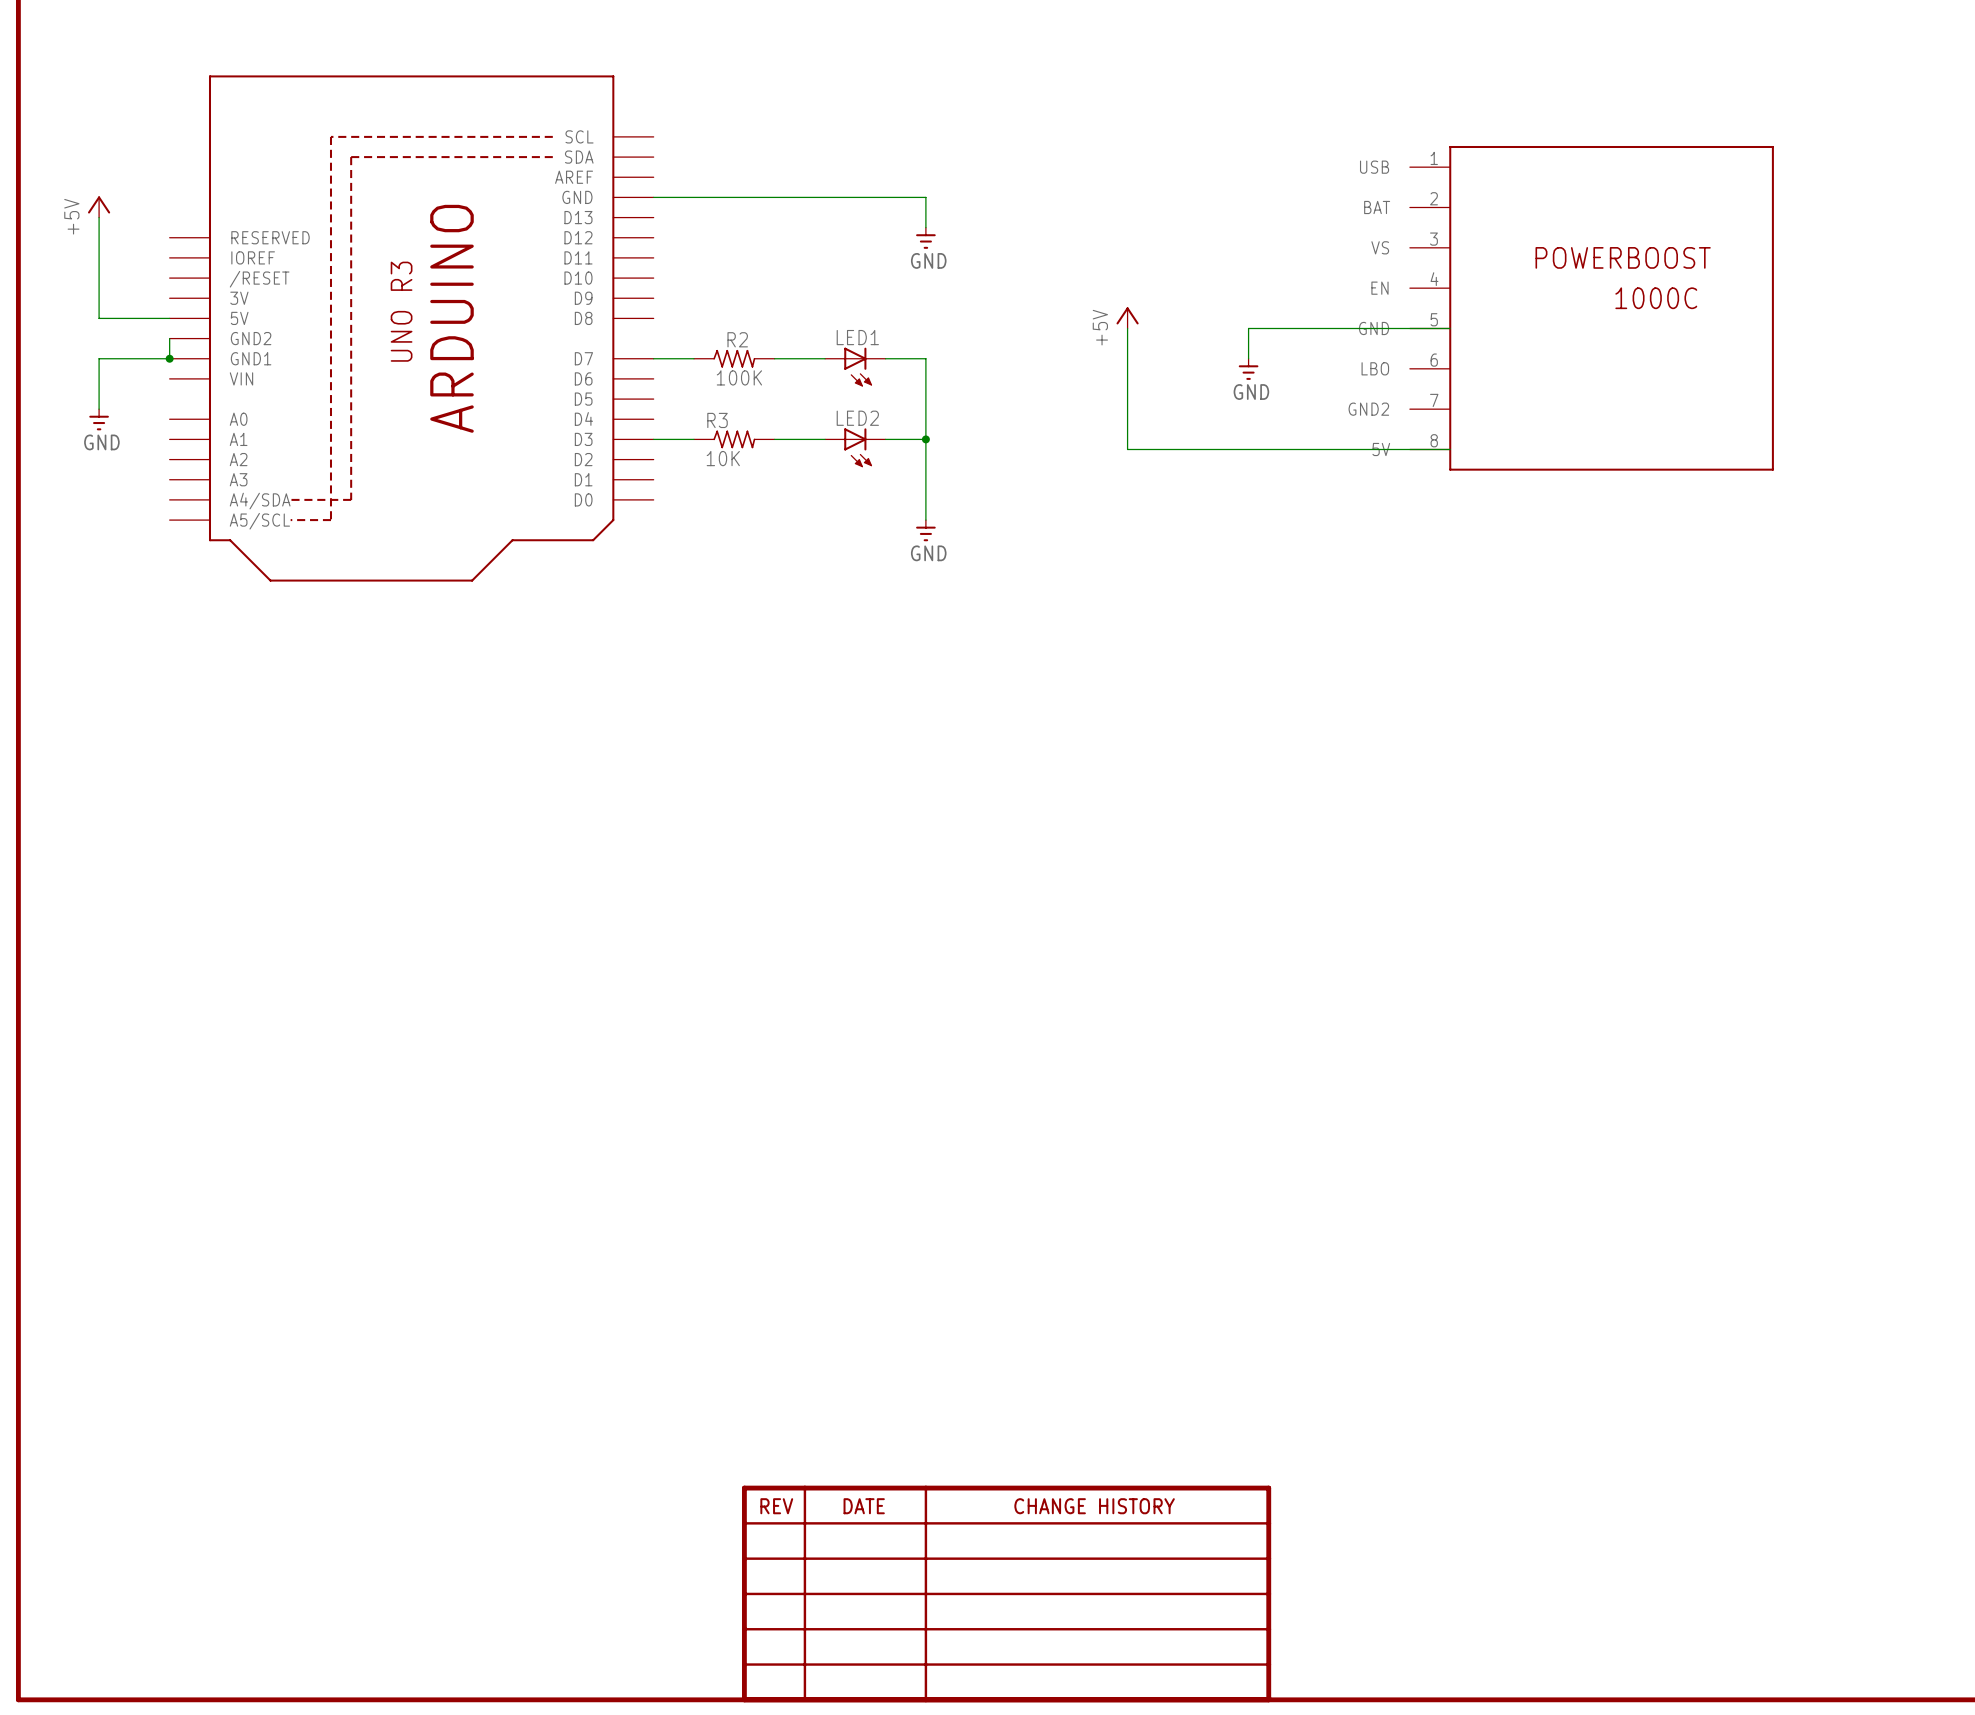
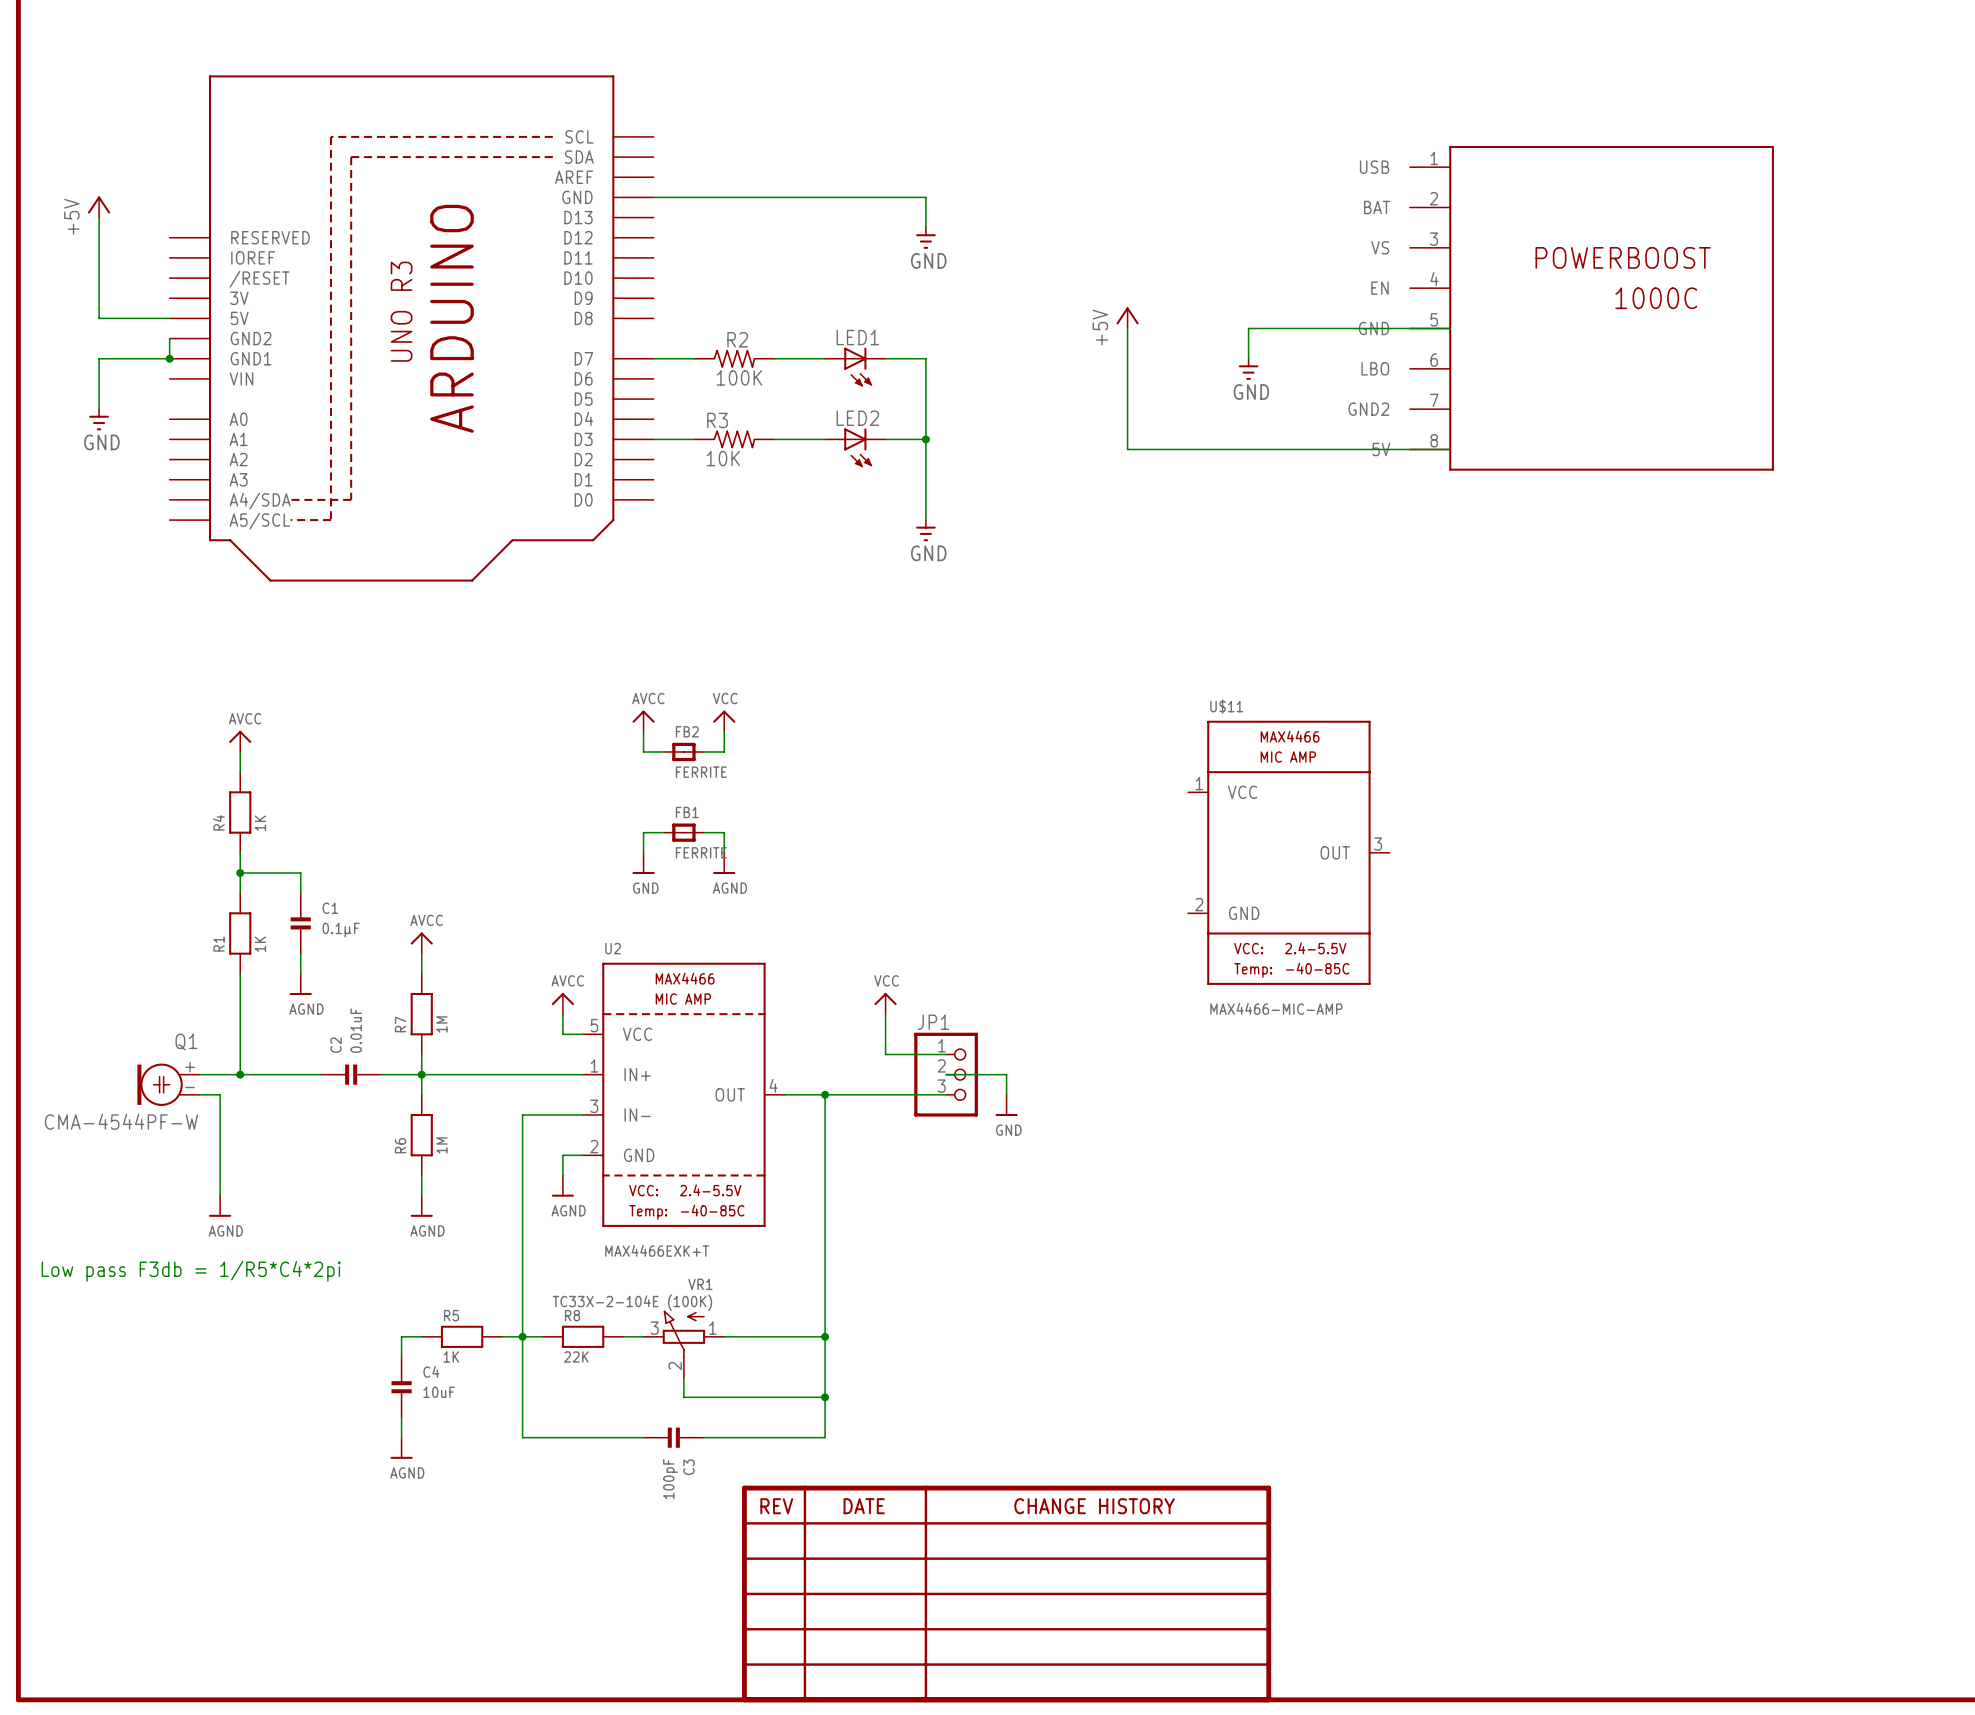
power symbol: none -> AVCC (643, 721)
power symbol: none -> VCC (724, 721)
wire: none -> (643, 731) (643, 751) (663, 751)
wire: none -> (724, 731) (724, 751) (704, 751)
power symbol: none -> AVCC (240, 741)
wire: none -> (240, 751) (240, 772)
FB2: none -> FERRITE (683, 751)
R4: none -> 1K (240, 812)
wire: none -> (663, 832) (643, 832) (643, 852)
FB1: none -> FERRITE (683, 832)
wire: none -> (704, 832) (724, 832) (724, 852)
wire: none -> (240, 852) (240, 893)
U$11: none -> MAX4466-MIC-AMP (1288, 852)
power symbol: none -> GND (643, 863)
power symbol: none -> AGND (724, 863)
wire: none -> (240, 872) (300, 872) (300, 893)
junction: none -> (240, 872)
C1: none -> 0.1µF (300, 923)
R1: none -> 1K (240, 933)
power symbol: none -> AVCC (421, 943)
wire: none -> (300, 953) (300, 973)
wire: none -> (421, 953) (421, 973)
wire: none -> (240, 973) (240, 1074)
power symbol: none -> AGND (300, 984)
power symbol: none -> AVCC (562, 1003)
power symbol: none -> VCC (885, 1003)
R7: none -> 1M (421, 1014)
wire: none -> (562, 1014) (562, 1034) (583, 1034)
wire: none -> (885, 1014) (885, 1054) (946, 1054)
wire: none -> (421, 1054) (421, 1094)
wire: none -> (199, 1074) (320, 1074)
junction: none -> (240, 1074)
C2: none -> 0.01uF (351, 1074)
wire: none -> (381, 1074) (583, 1074)
junction: none -> (421, 1074)
wire: none -> (946, 1074) (1006, 1074) (1006, 1094)
JP1: none -> (946, 1074)
Q1: none -> CMA-4544PF-W (168, 1084)
wire: none -> (199, 1094) (220, 1094) (220, 1195)
U2: none -> MAX4466EXK+T (683, 1094)
wire: none -> (784, 1094) (946, 1094)
wire: none -> (825, 1094) (825, 1437) (704, 1437)
junction: none -> (825, 1094)
power symbol: none -> GND (1006, 1105)
wire: none -> (583, 1114) (522, 1114) (522, 1437) (643, 1437)
R6: none -> 1M (421, 1135)
wire: none -> (583, 1155) (562, 1155) (562, 1175)
wire: none -> (421, 1175) (421, 1195)
power symbol: none -> AGND (562, 1186)
power symbol: none -> AGND (220, 1206)
power symbol: none -> AGND (421, 1206)
text: none -> Low pass F3db = 1/R5*C4*2pi (191, 1271)
wire: none -> (421, 1336) (401, 1336) (401, 1356)
R5: none -> 1K (462, 1336)
wire: none -> (502, 1336) (542, 1336)
junction: none -> (522, 1336)
R8: none -> 22K (583, 1336)
wire: none -> (623, 1336) (643, 1336)
wire: none -> (724, 1336) (825, 1336)
junction: none -> (825, 1336)
VR1: none -> TC33X-2-104E (100K) (683, 1343)
wire: none -> (683, 1377) (683, 1397) (825, 1397)
C4: none -> 10uF (401, 1387)
junction: none -> (825, 1397)
wire: none -> (401, 1417) (401, 1437)
C3: none -> 100pF (673, 1437)
power symbol: none -> AGND (401, 1448)

